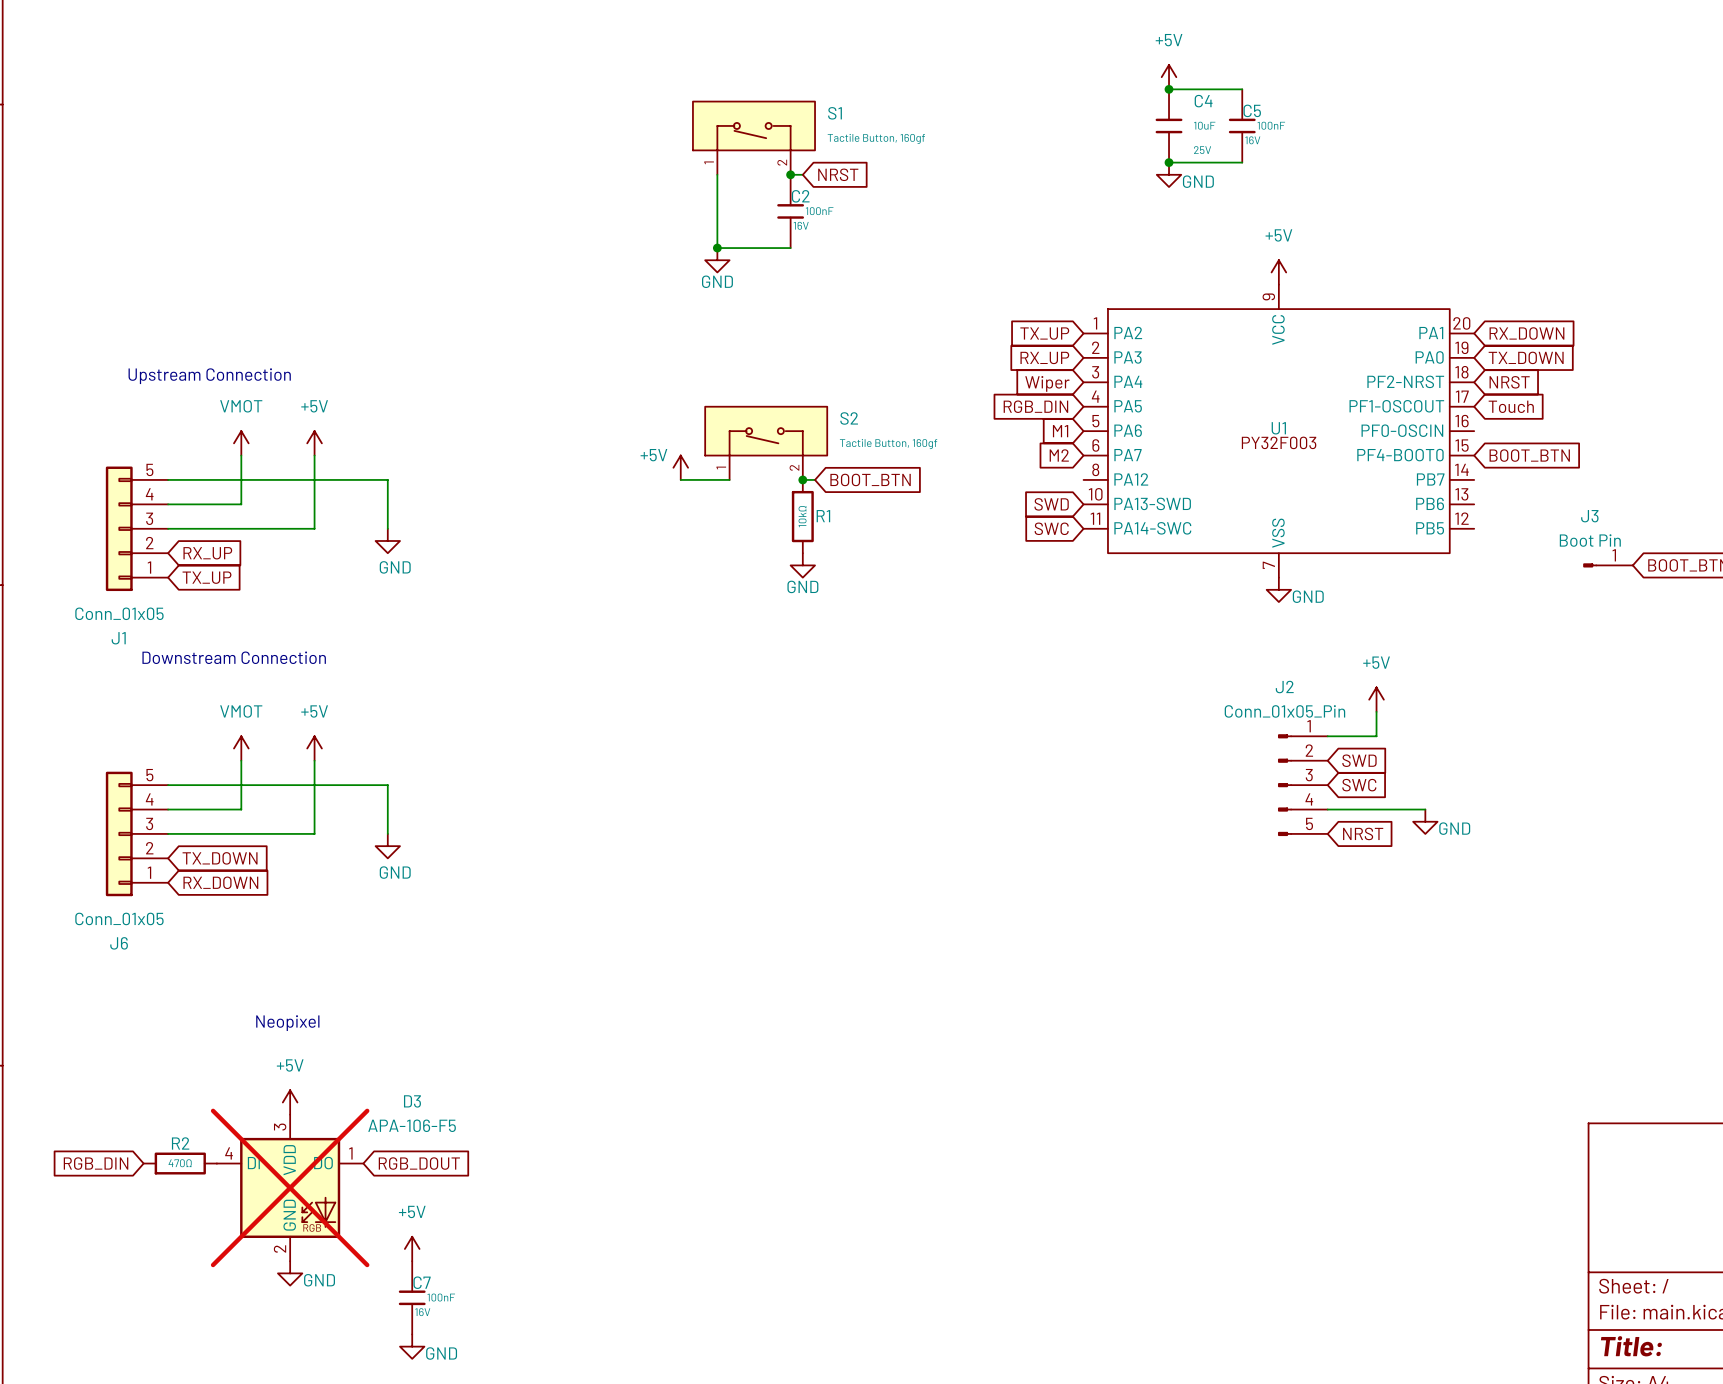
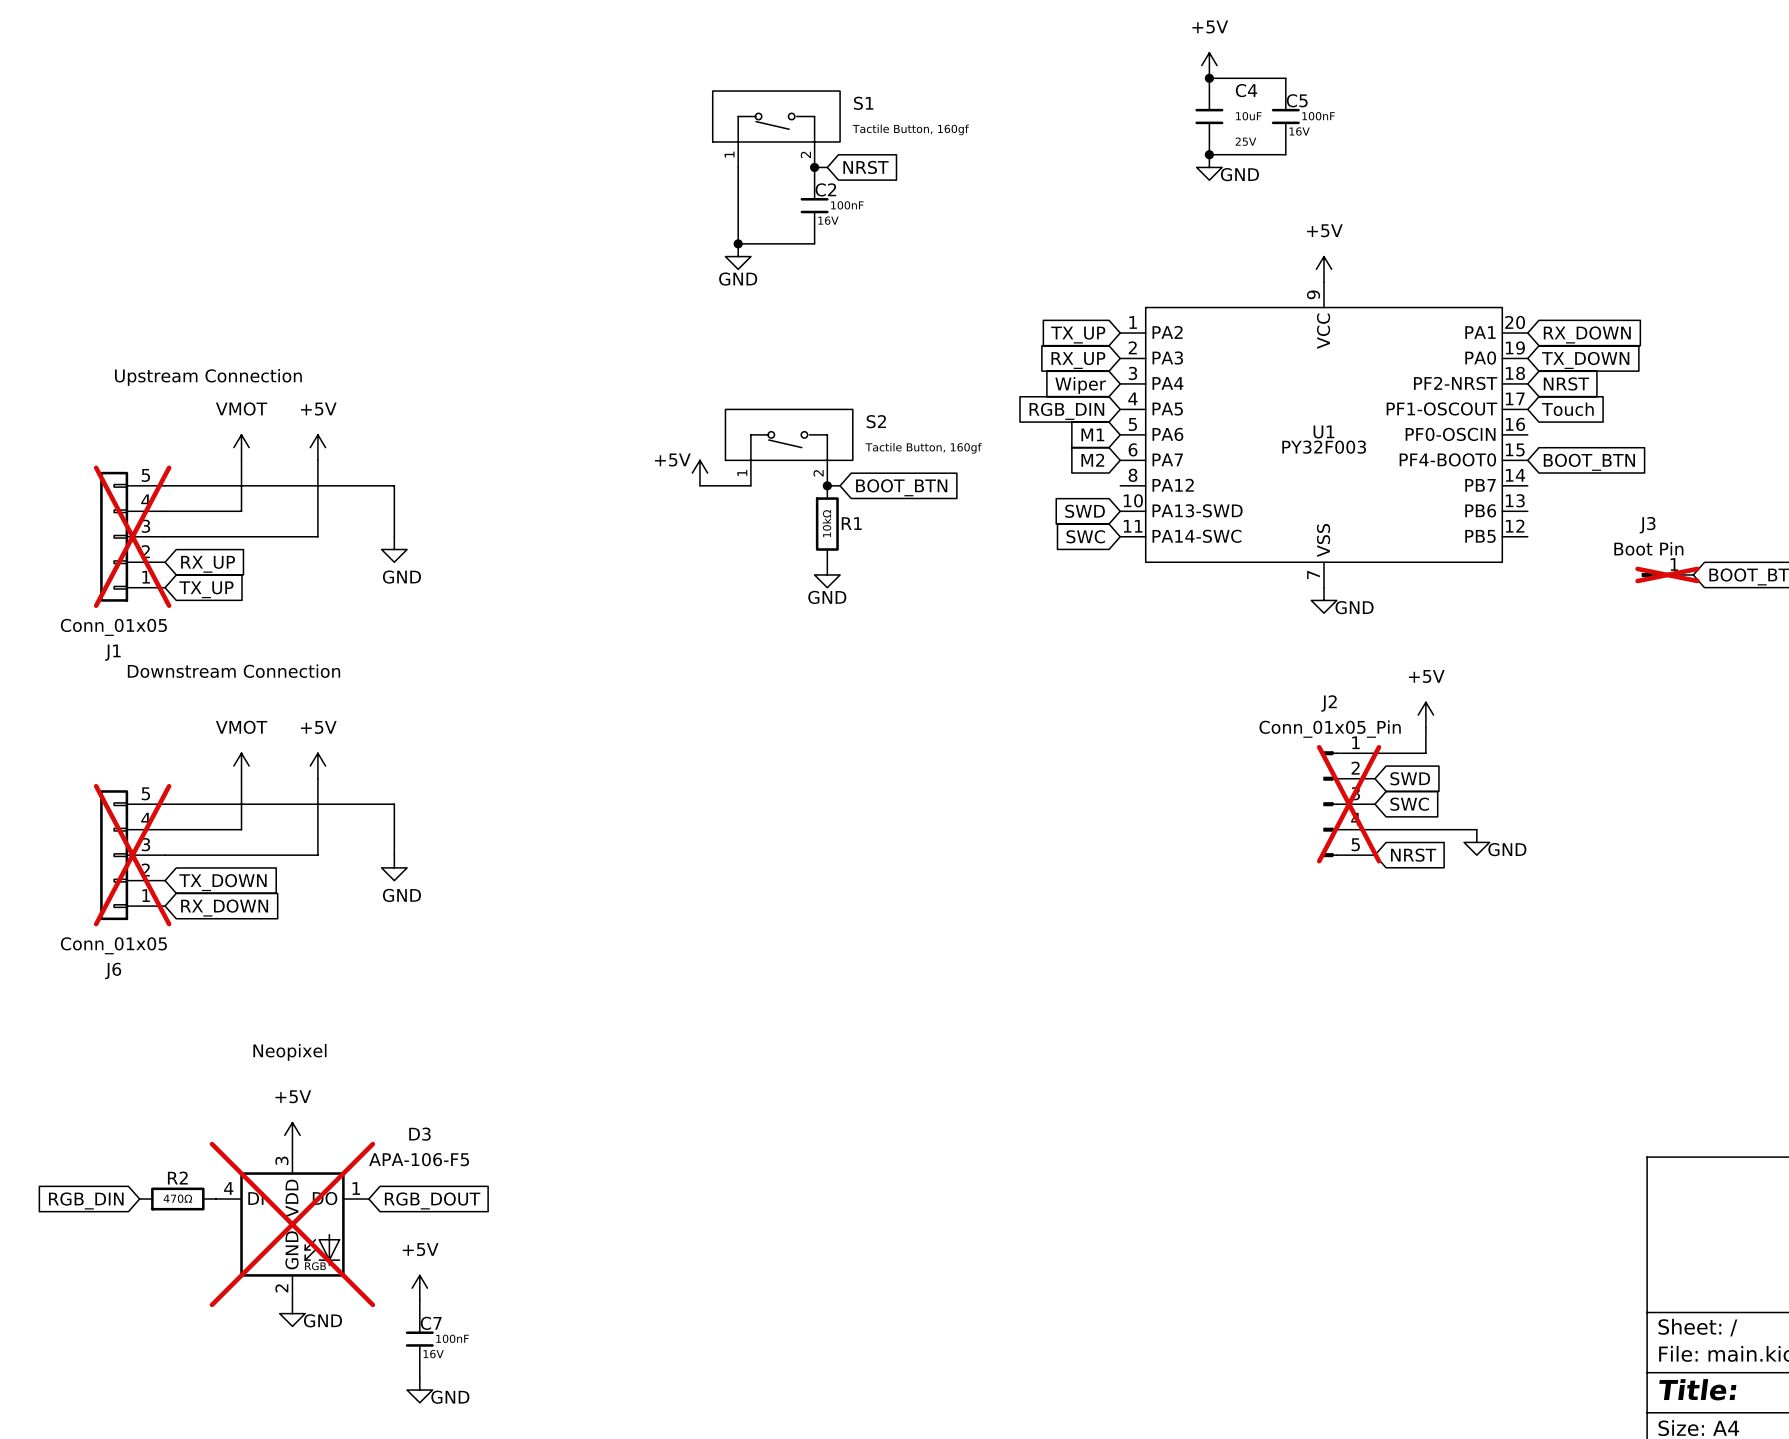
J1 do-not-place cross: none -> (132, 536)
J3 do-not-place cross: none -> (1667, 574)
J2 do-not-place cross: none -> (1349, 804)
J6 do-not-place cross: none -> (132, 855)

